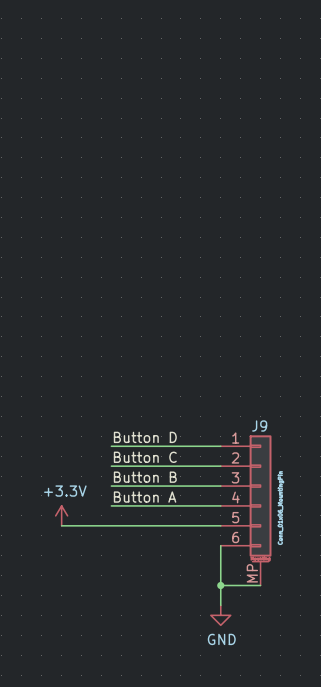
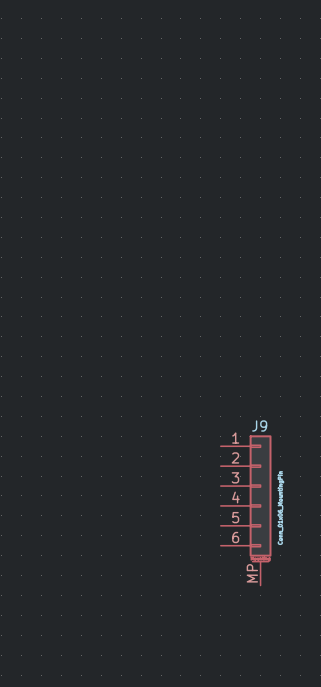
label: Button D (145, 437) -> none
wire: (111, 446) (220, 446) -> none
label: Button C (145, 457) -> none
wire: (111, 466) (220, 466) -> none
label: Button B (145, 477) -> none
wire: (111, 486) (220, 486) -> none
label: Button A (145, 497) -> none
wire: (111, 505) (220, 505) -> none
power symbol: +3.3V (61, 515) -> none
wire: (61, 525) (220, 525) -> none
wire: (220, 545) (220, 605) -> none
wire: (220, 585) (260, 585) -> none
junction: (220, 585) -> none
power symbol: GND (220, 615) -> none

